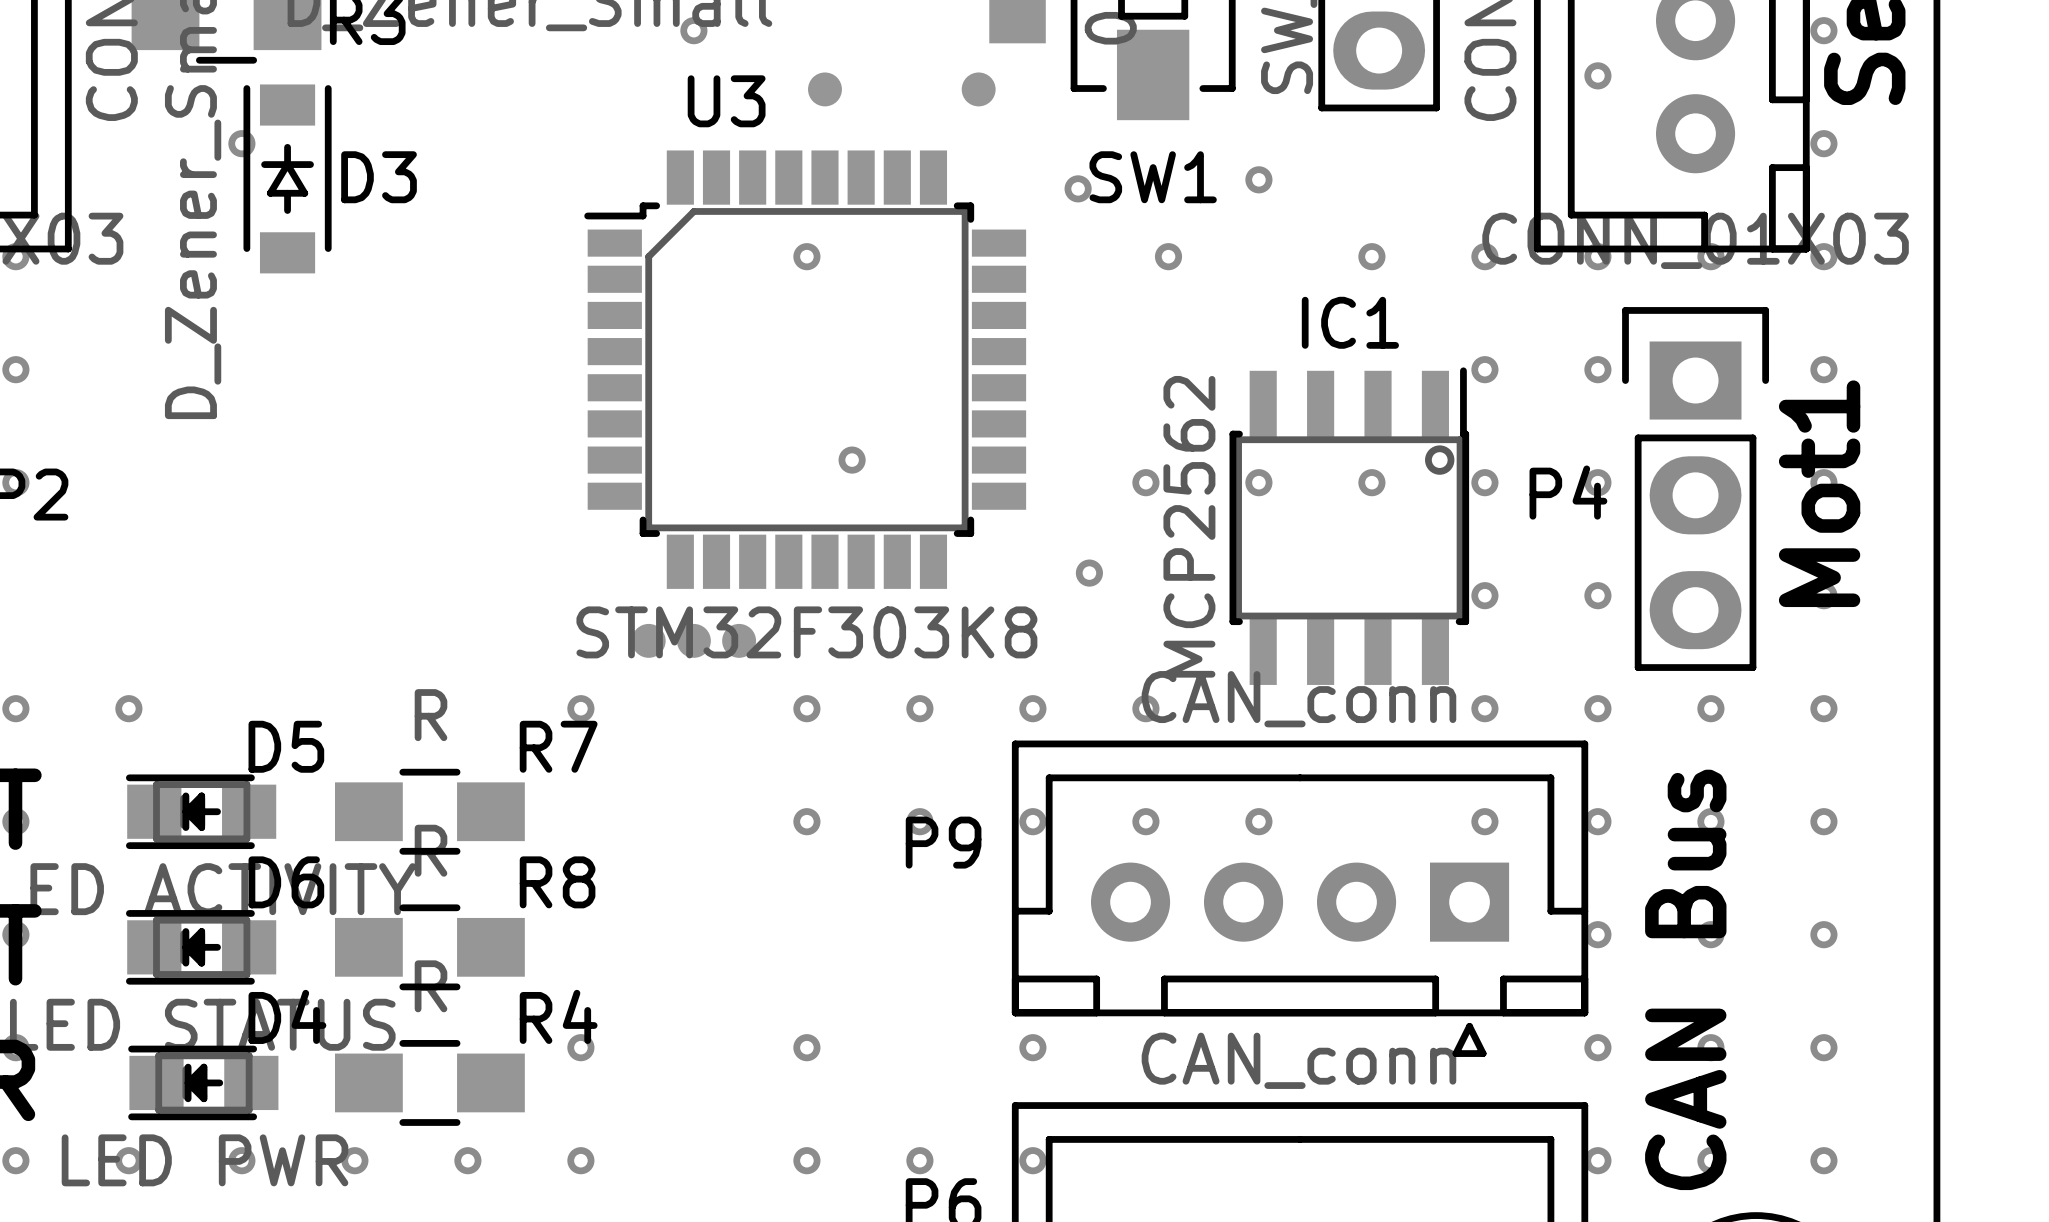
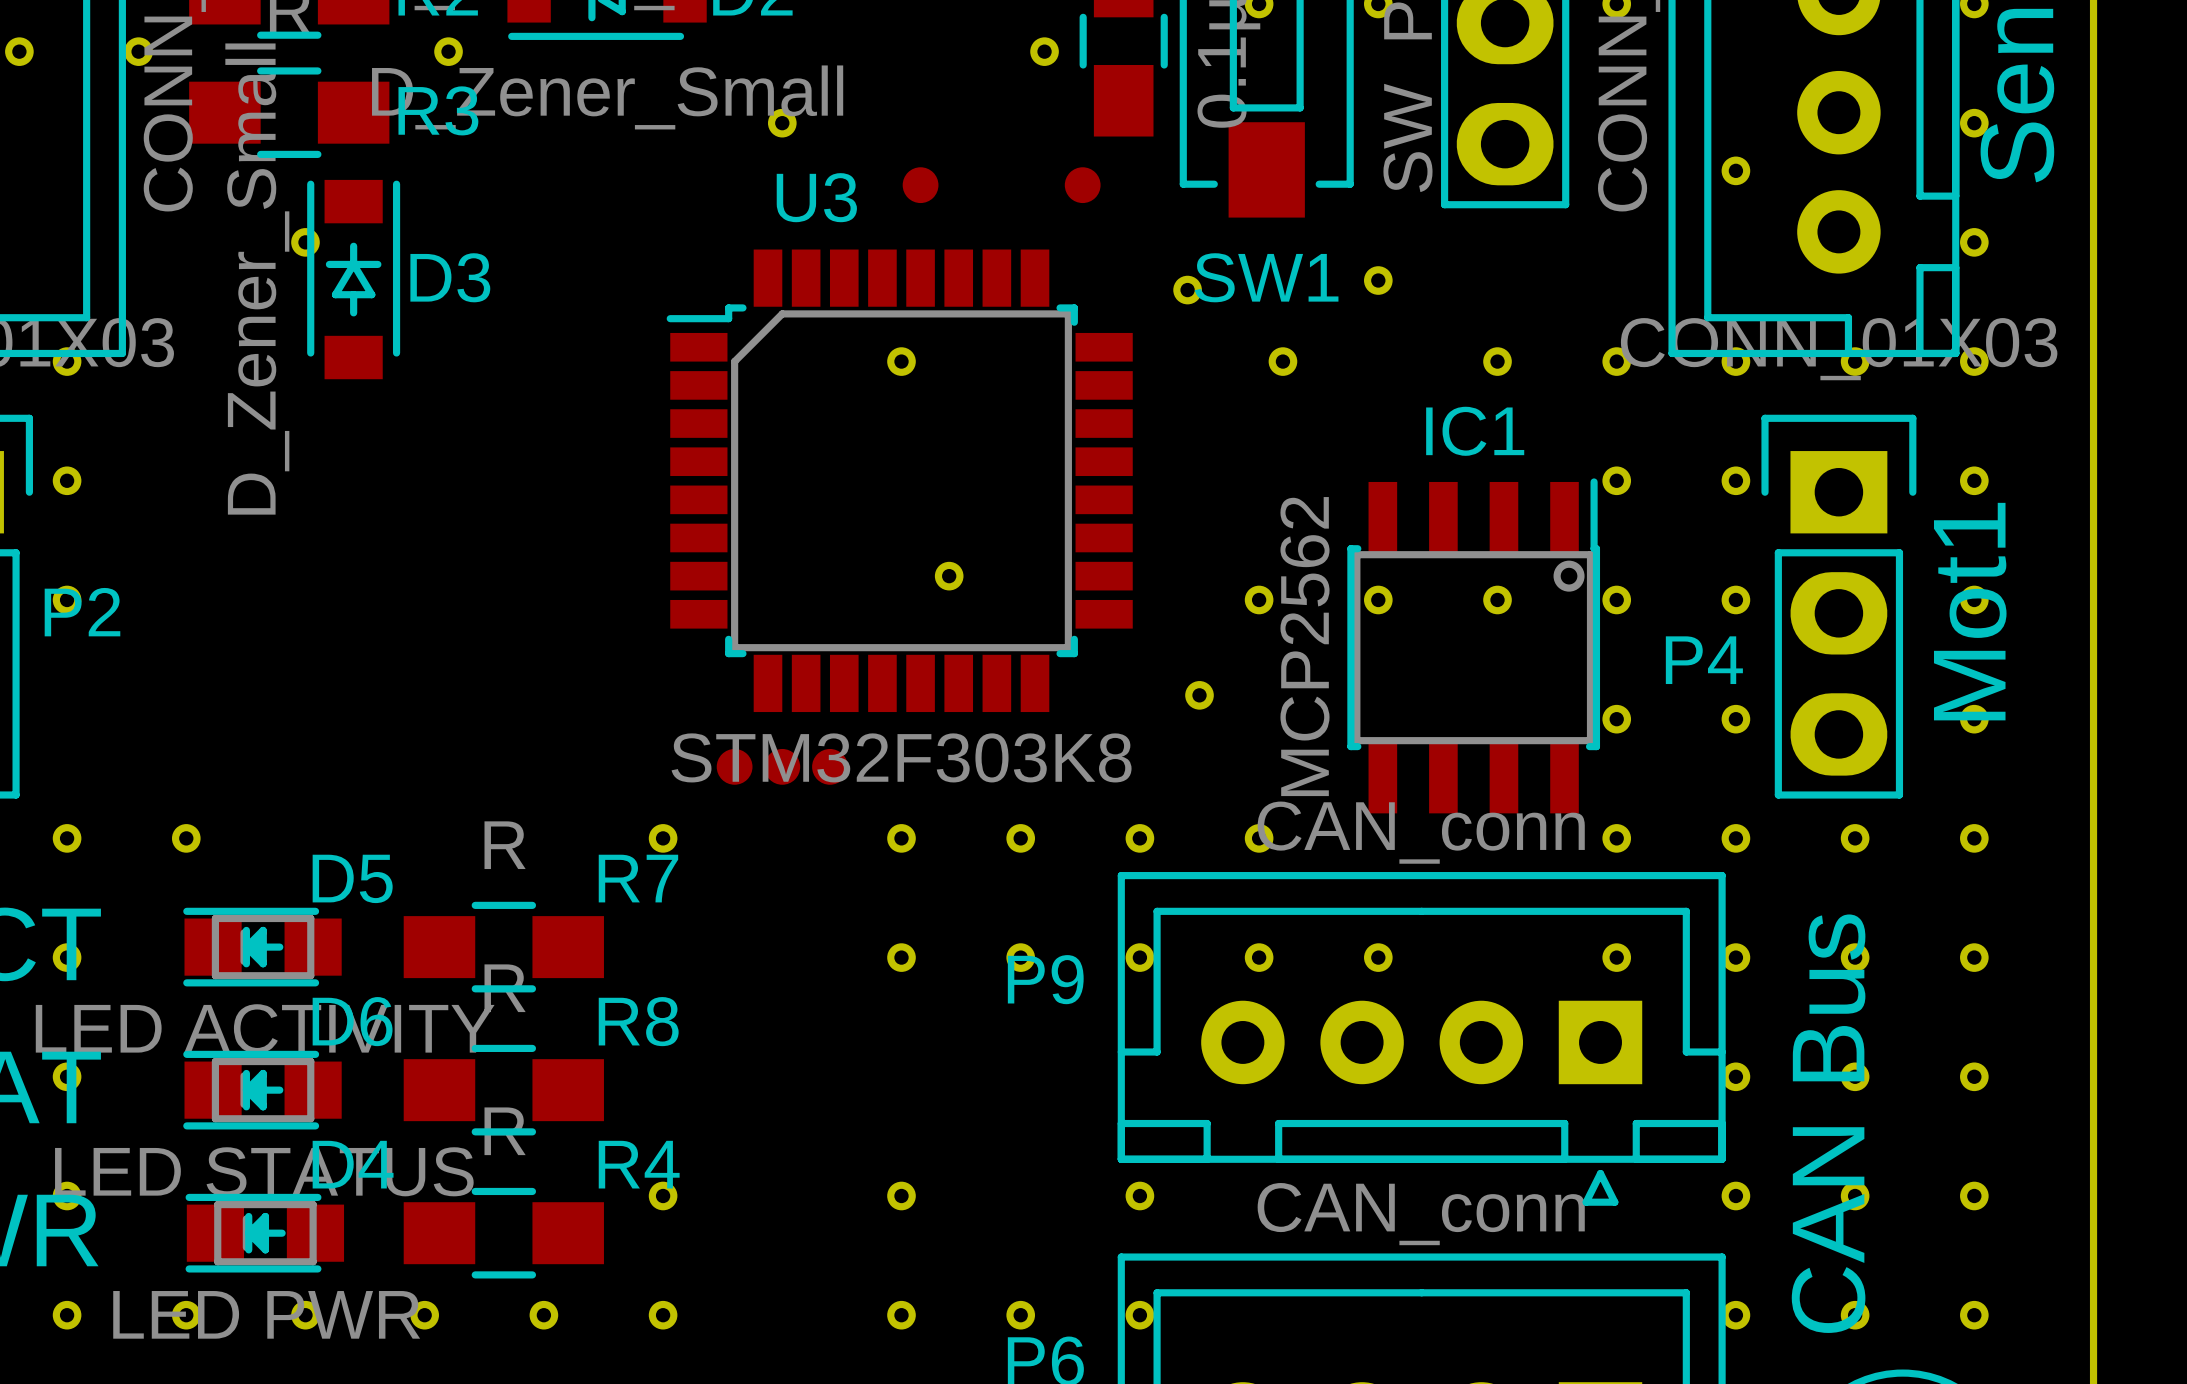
P4 name position: P4 (1568, 492) -> P4 (1704, 660)

